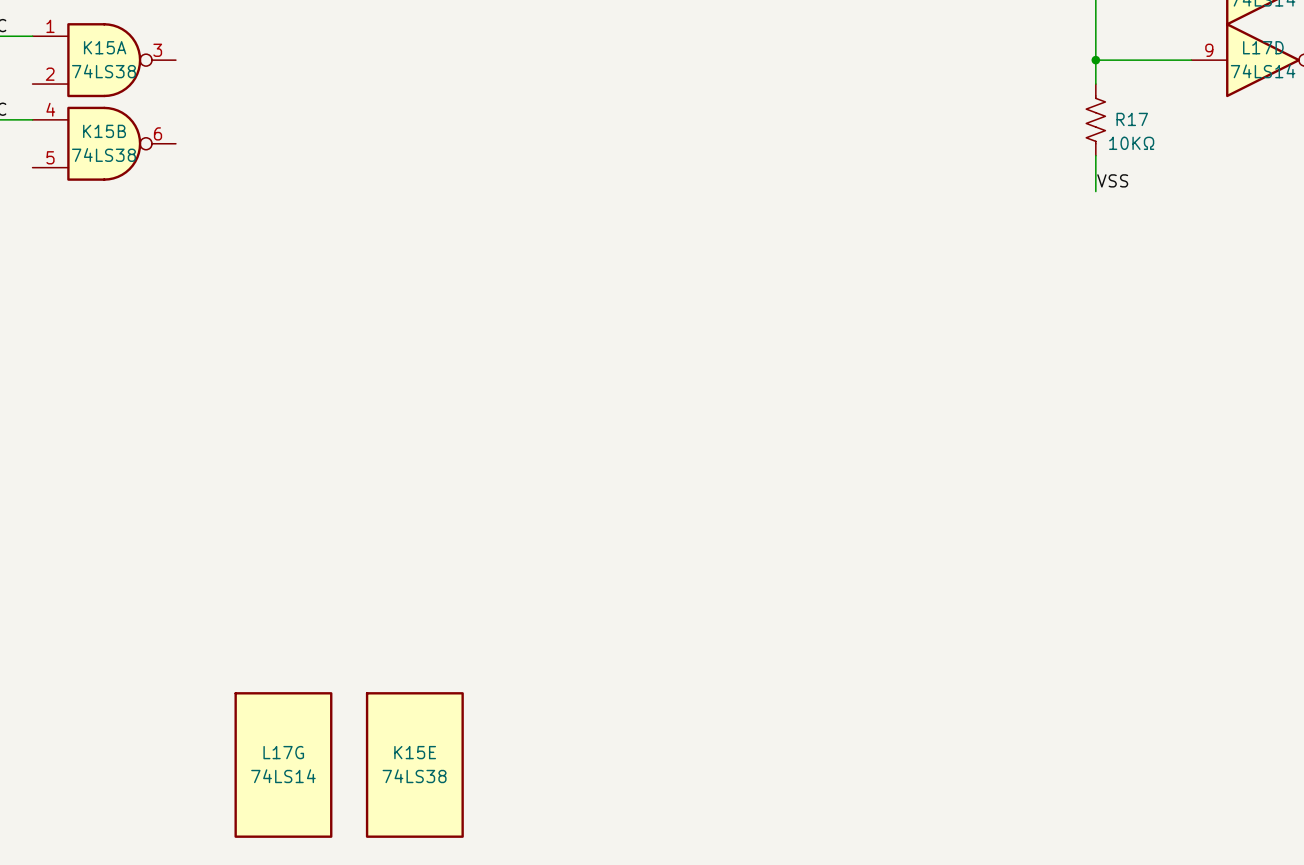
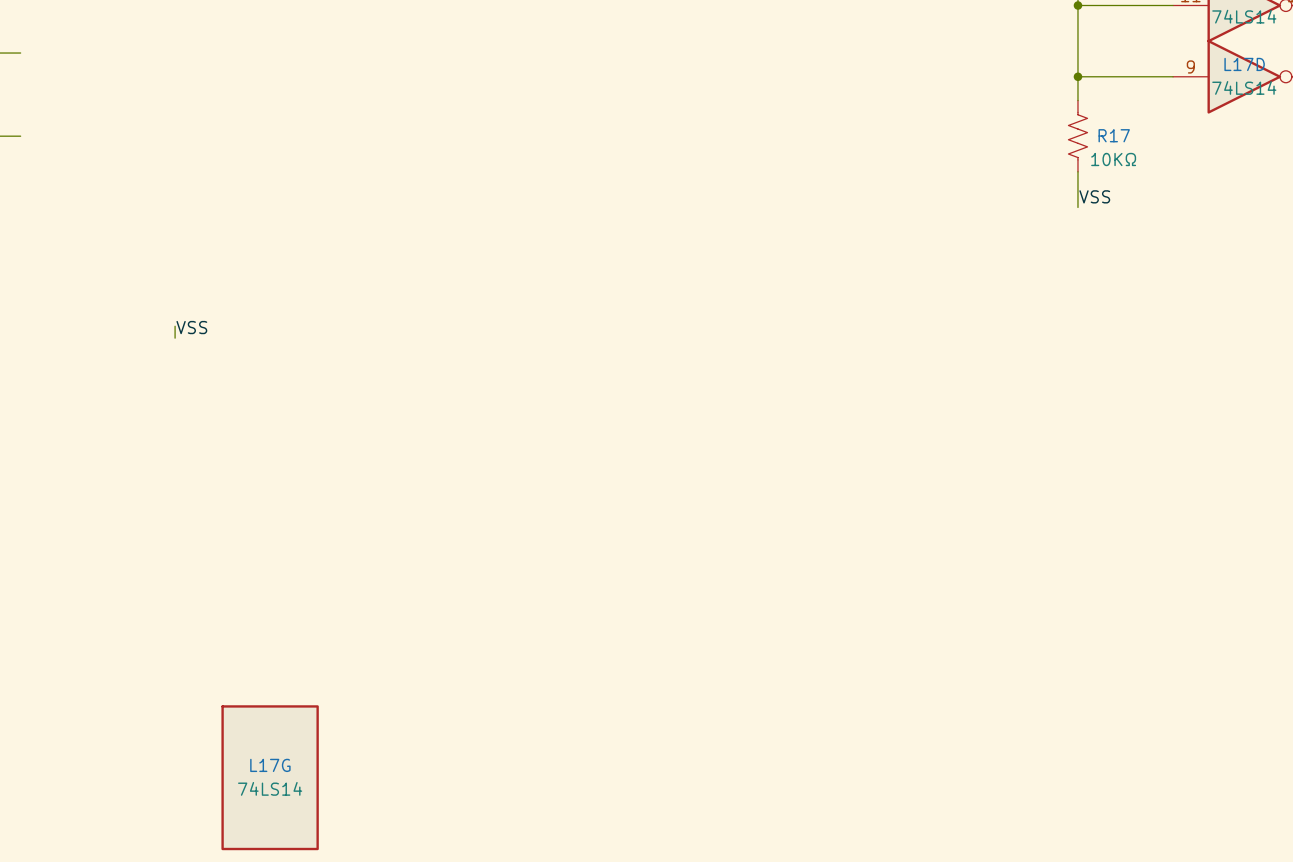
K15A: 74LS38 (104, 60) -> none
K15B: 74LS38 (104, 143) -> none
wire: none -> (175, 326) (175, 338)
label: none -> VSS (191, 327)
K15E: 74LS38 (414, 764) -> none

